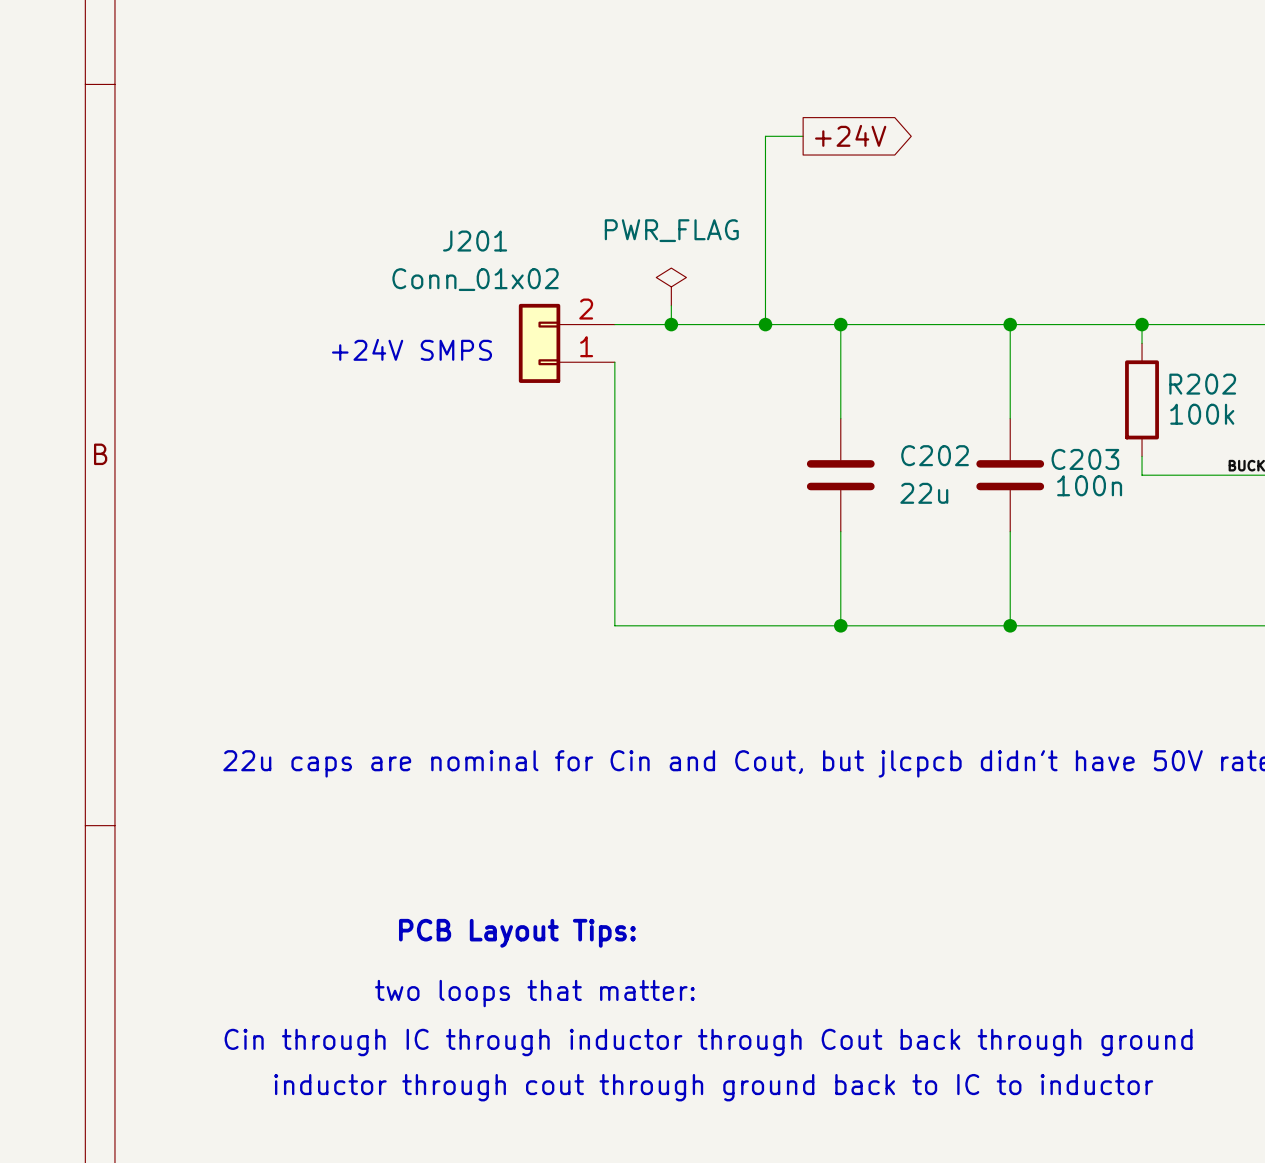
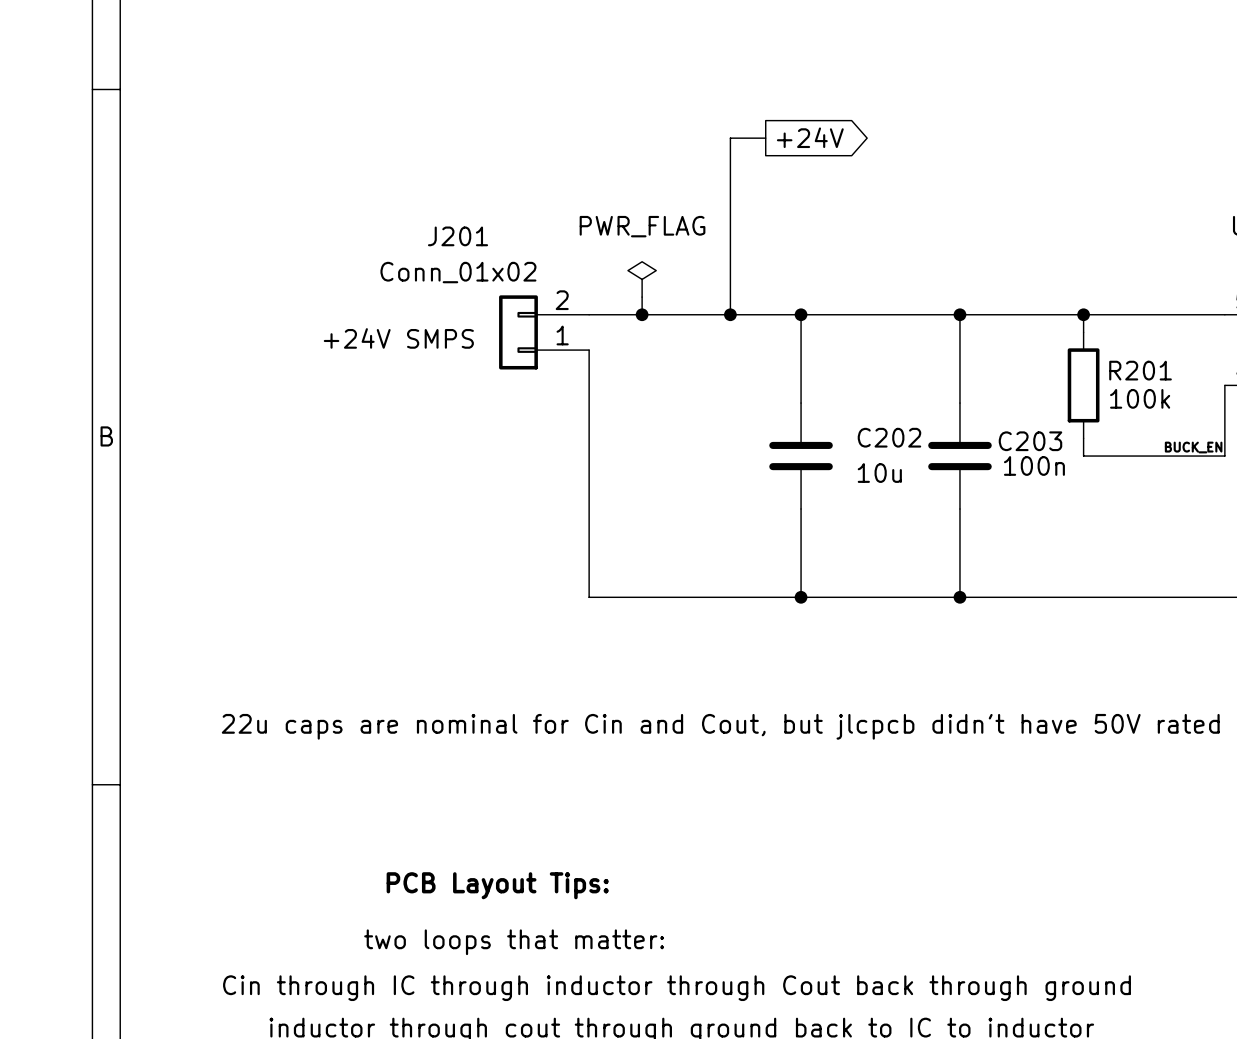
R202 name: R202 (1202, 384) -> R201 (1140, 370)
C202 value: 22u (924, 493) -> 10u (879, 473)

